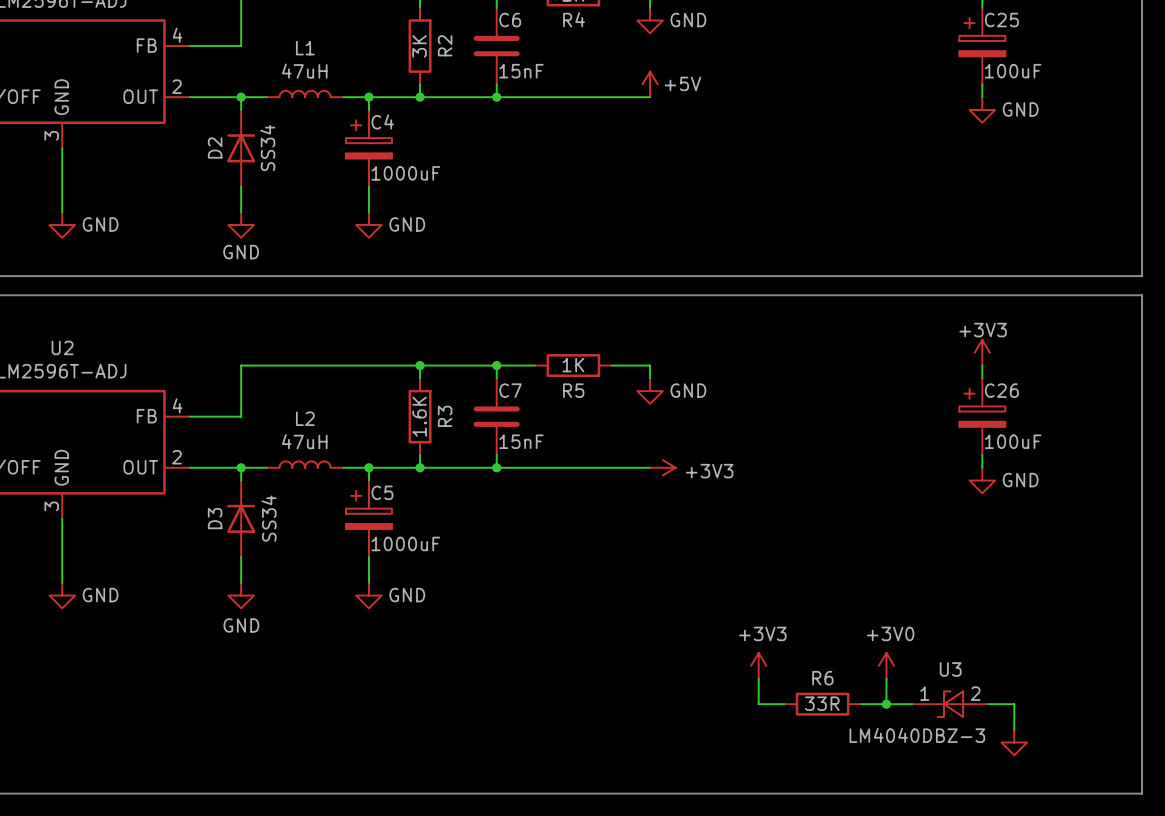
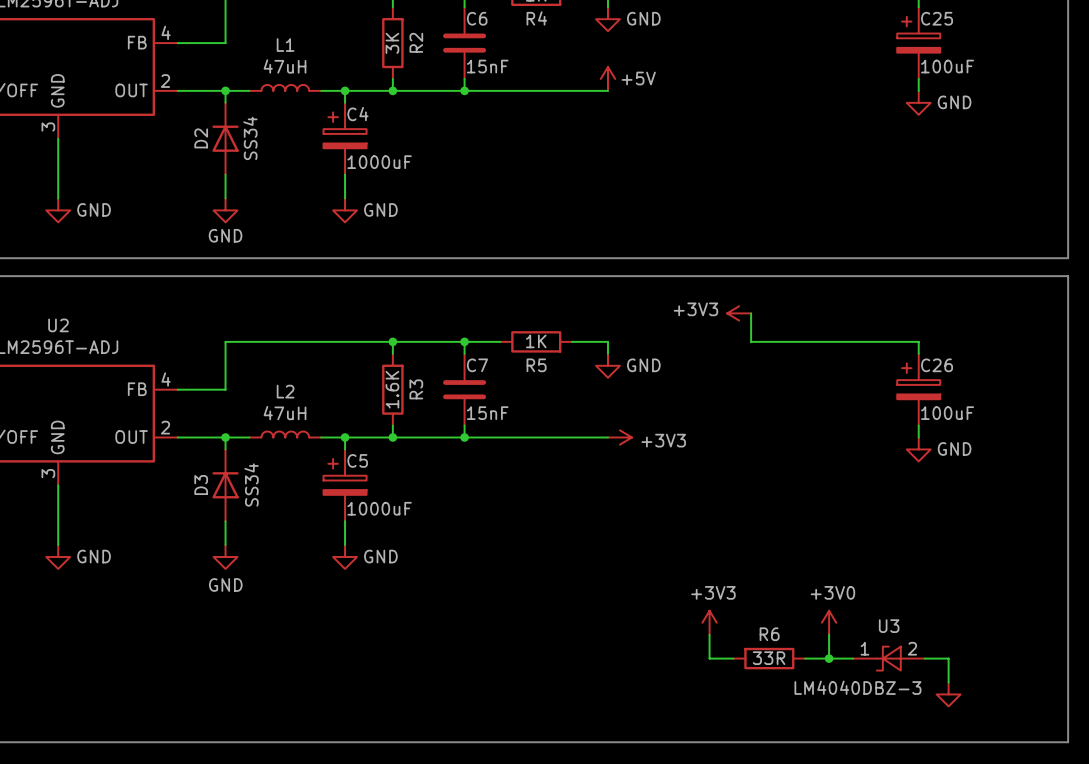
power symbol text position: +3V3 (983, 330) -> +3V3 (695, 309)
wire: none -> (751, 313) (751, 341) (918, 341)
power symbol rotation: 0° (982, 352) -> 90° counterclockwise (739, 313)
power symbol position: +3V3 (982, 352) -> +3V3 (739, 313)

